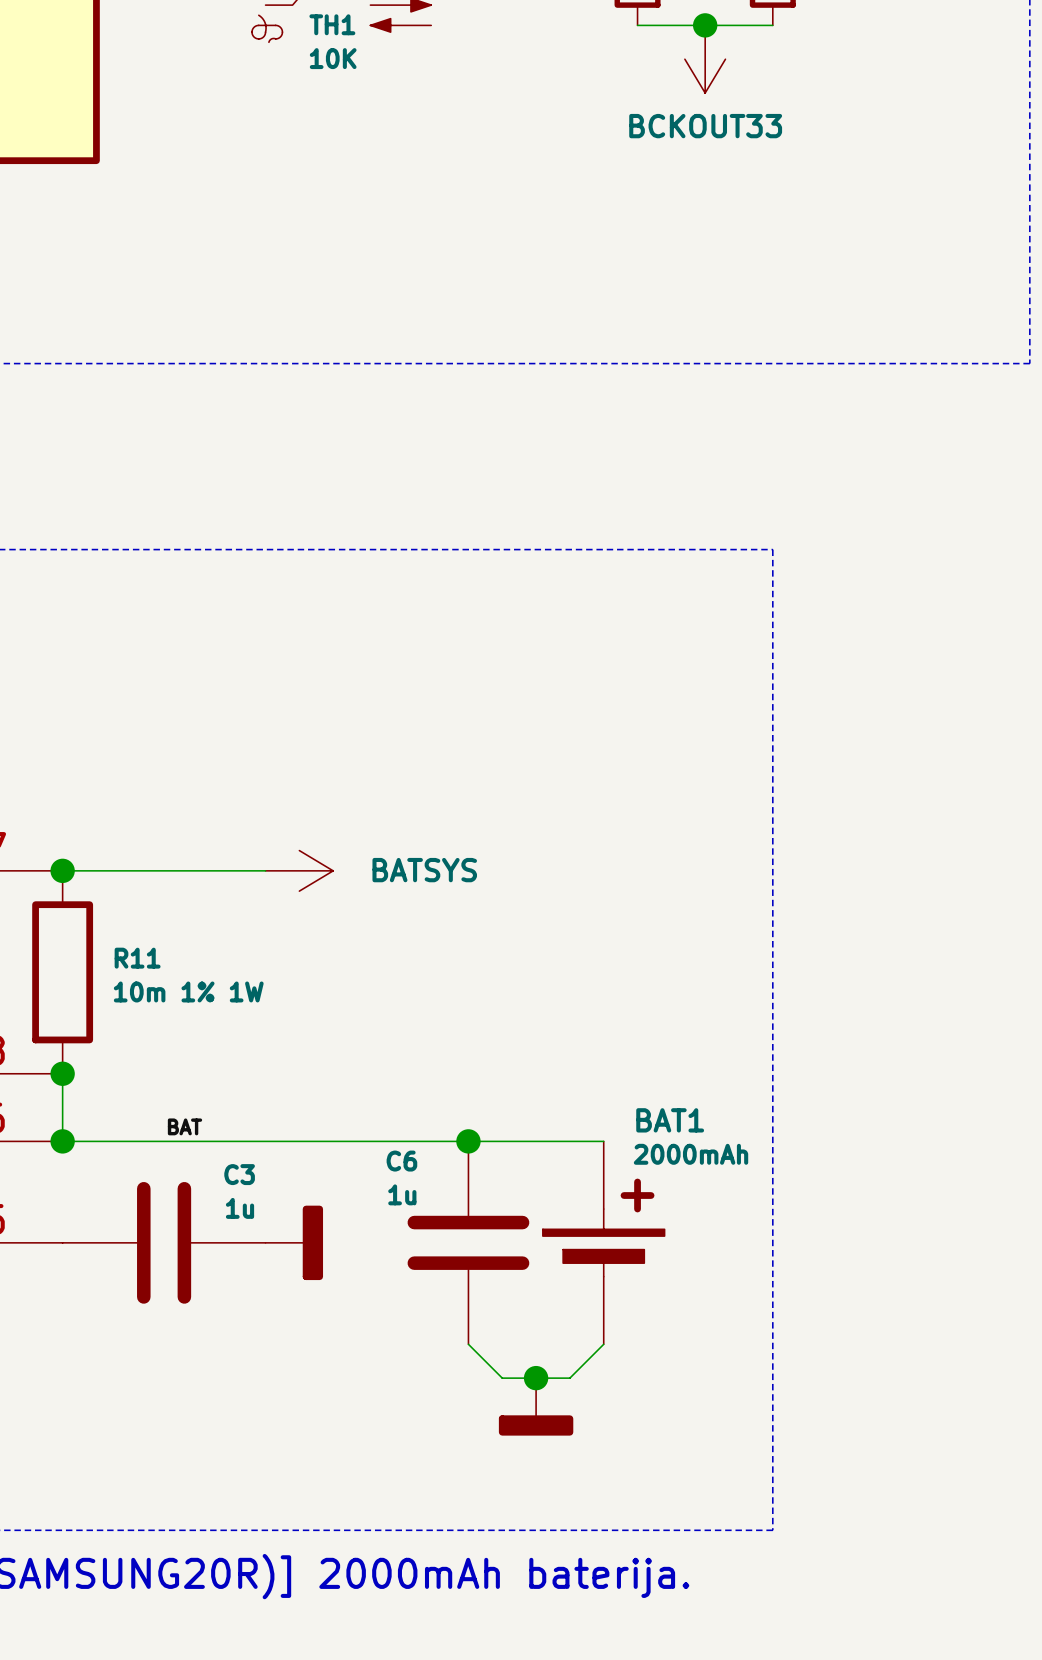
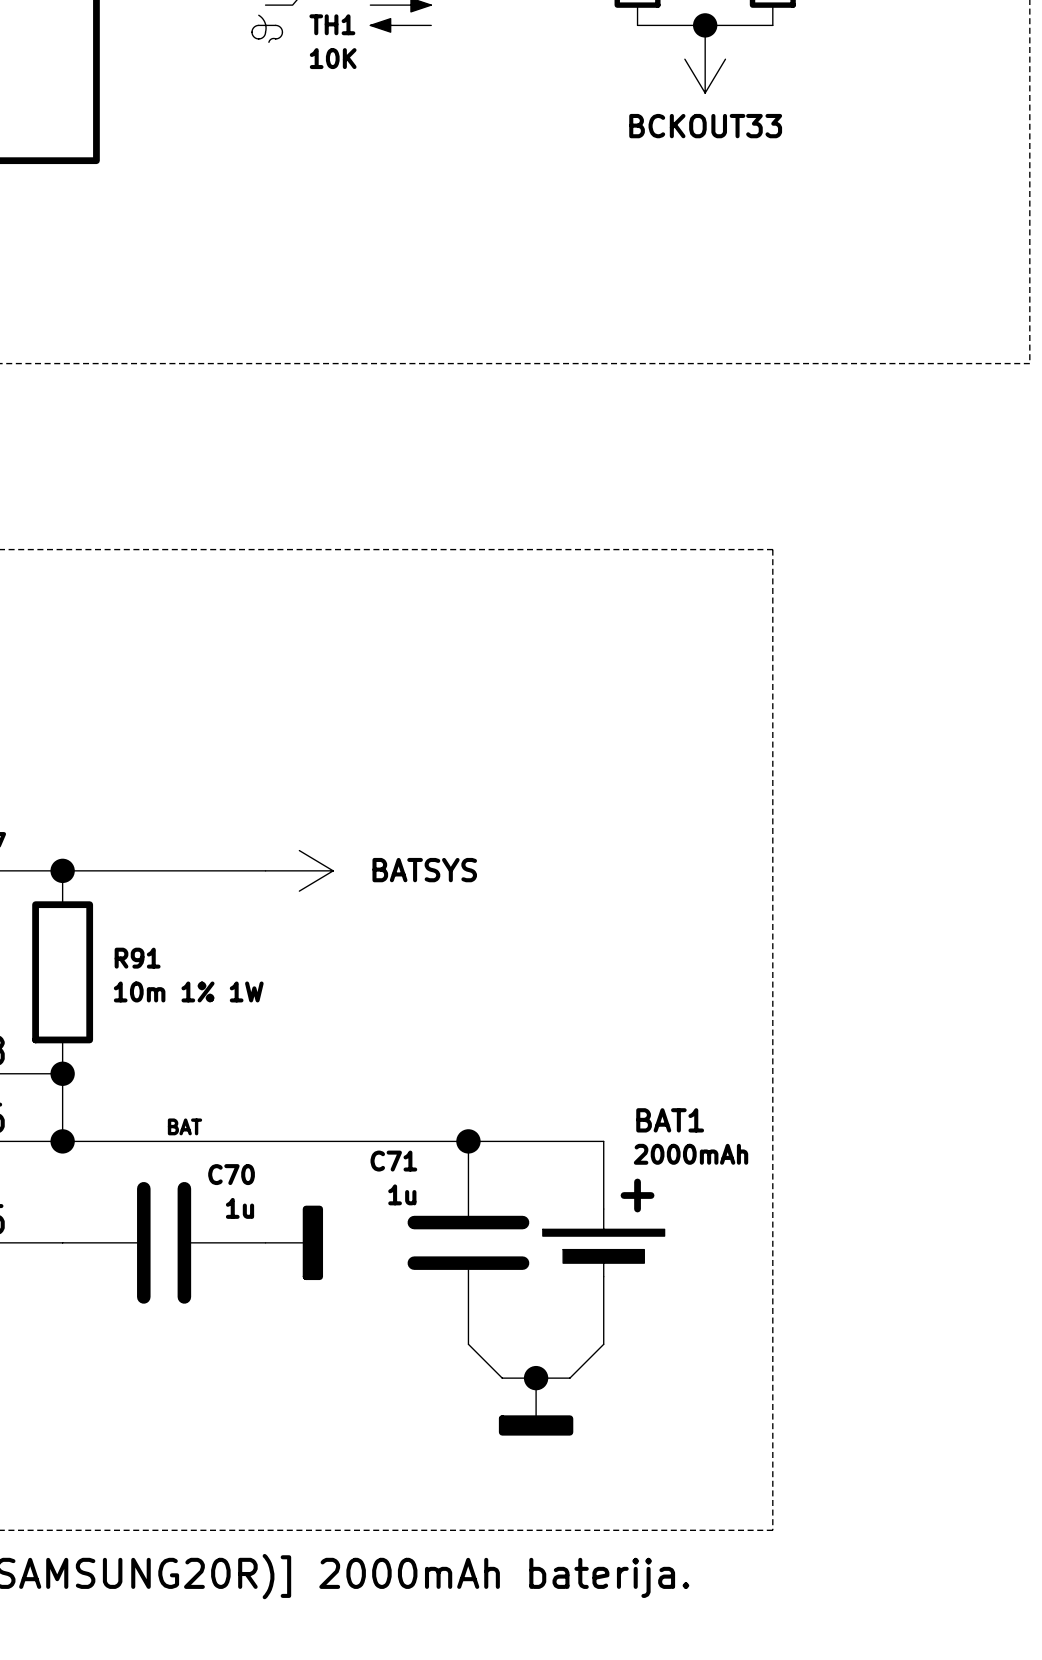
R11 name: R11 (137, 958) -> R91 (137, 958)
C6 name: C6 (401, 1161) -> C71 (393, 1161)
C3 name: C3 (239, 1174) -> C70 (231, 1174)

